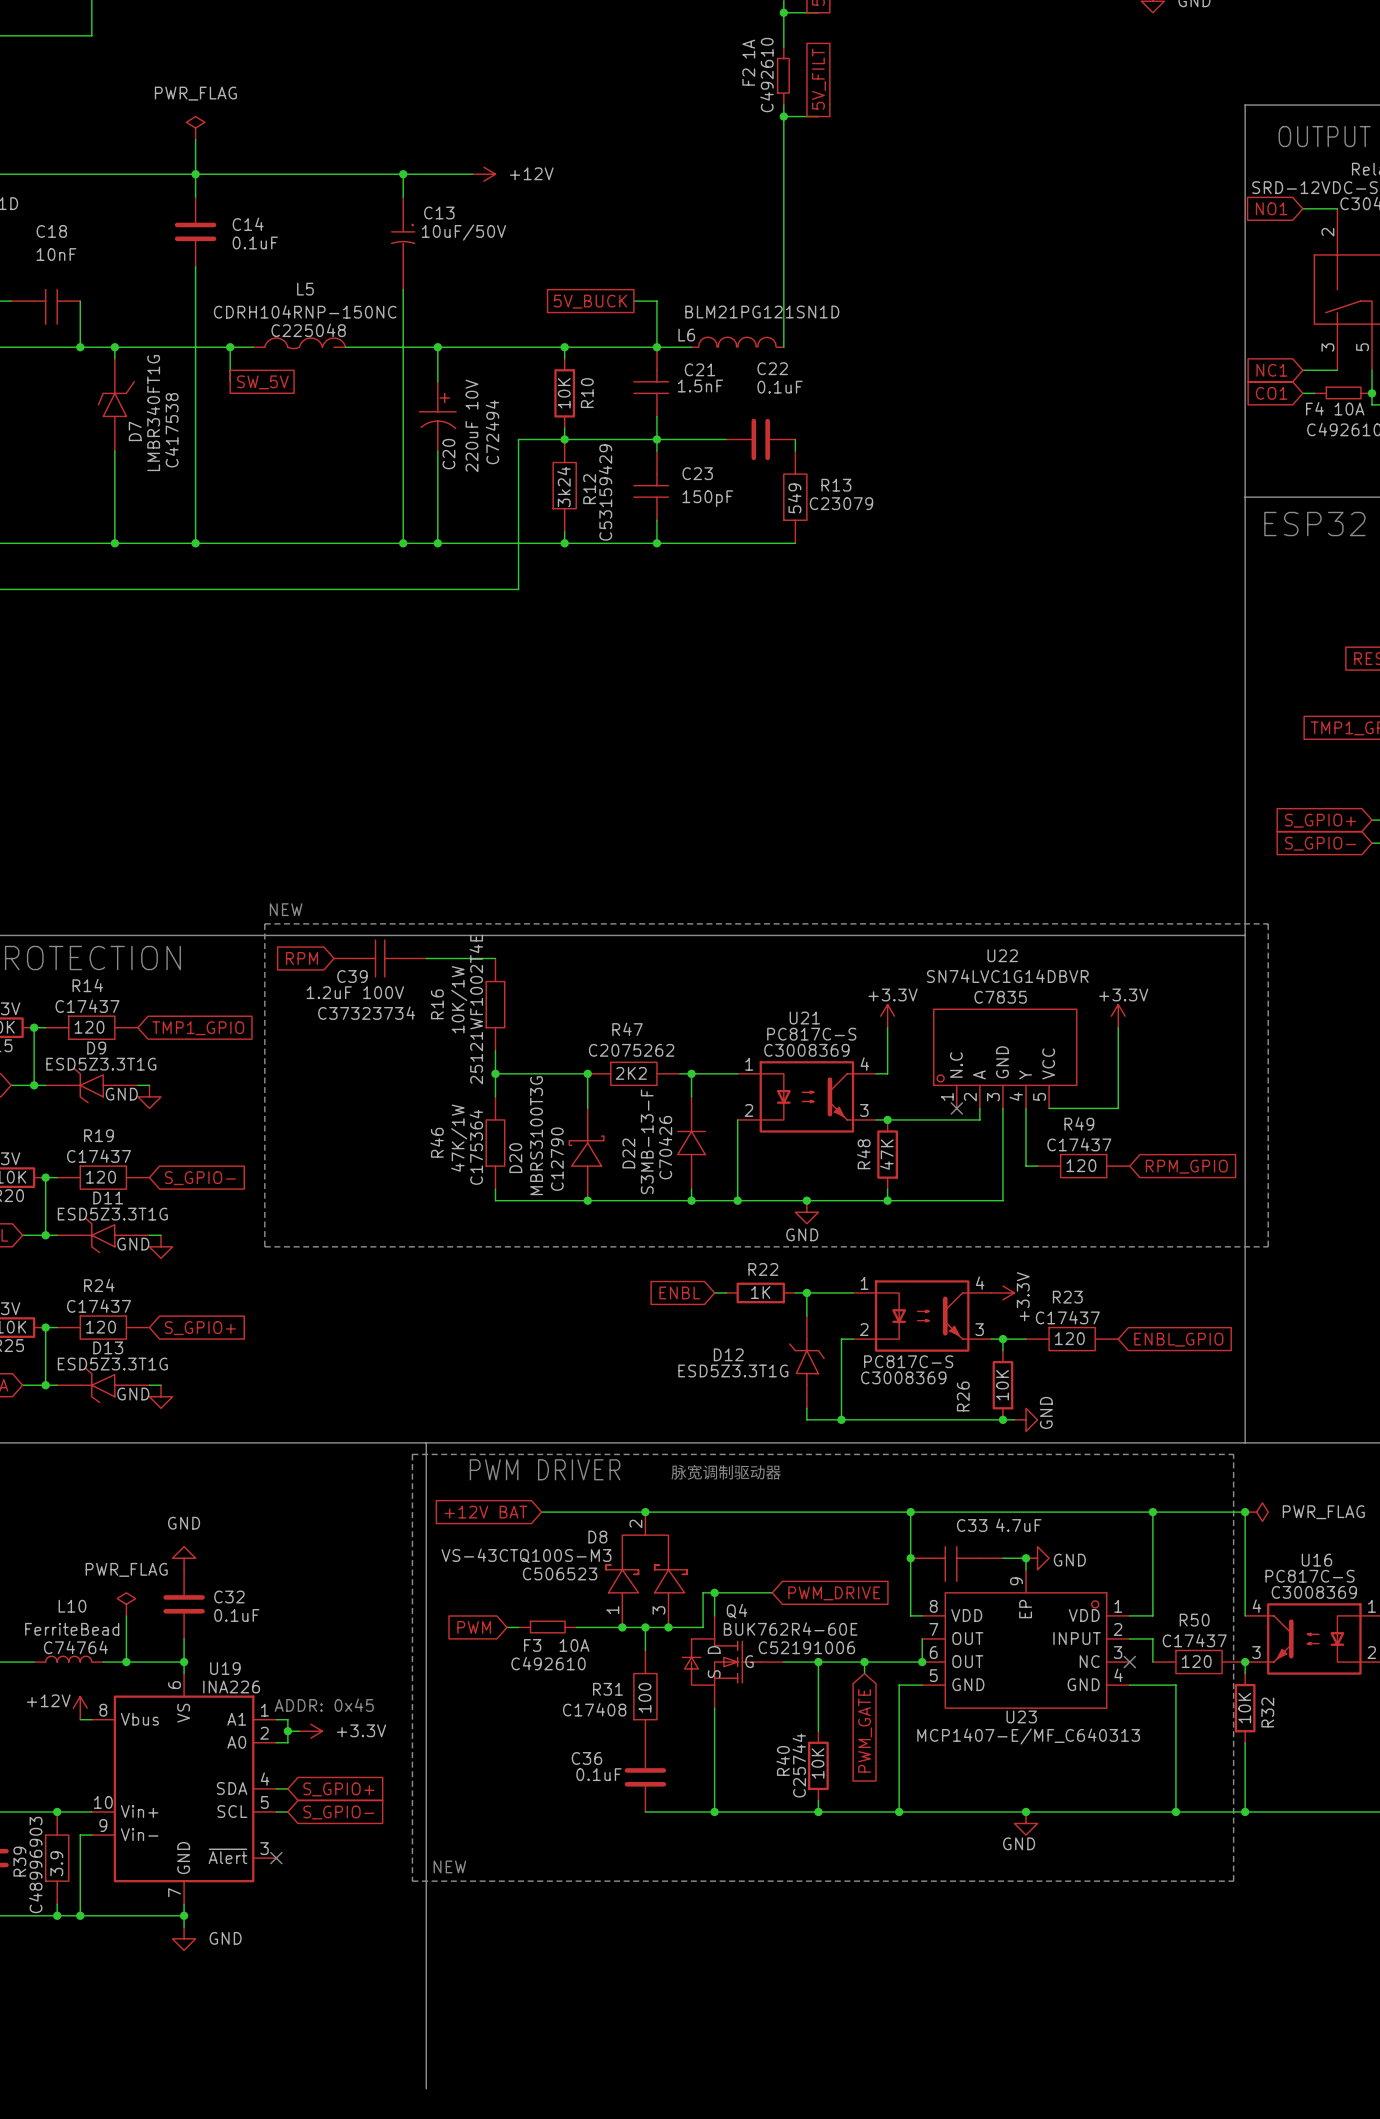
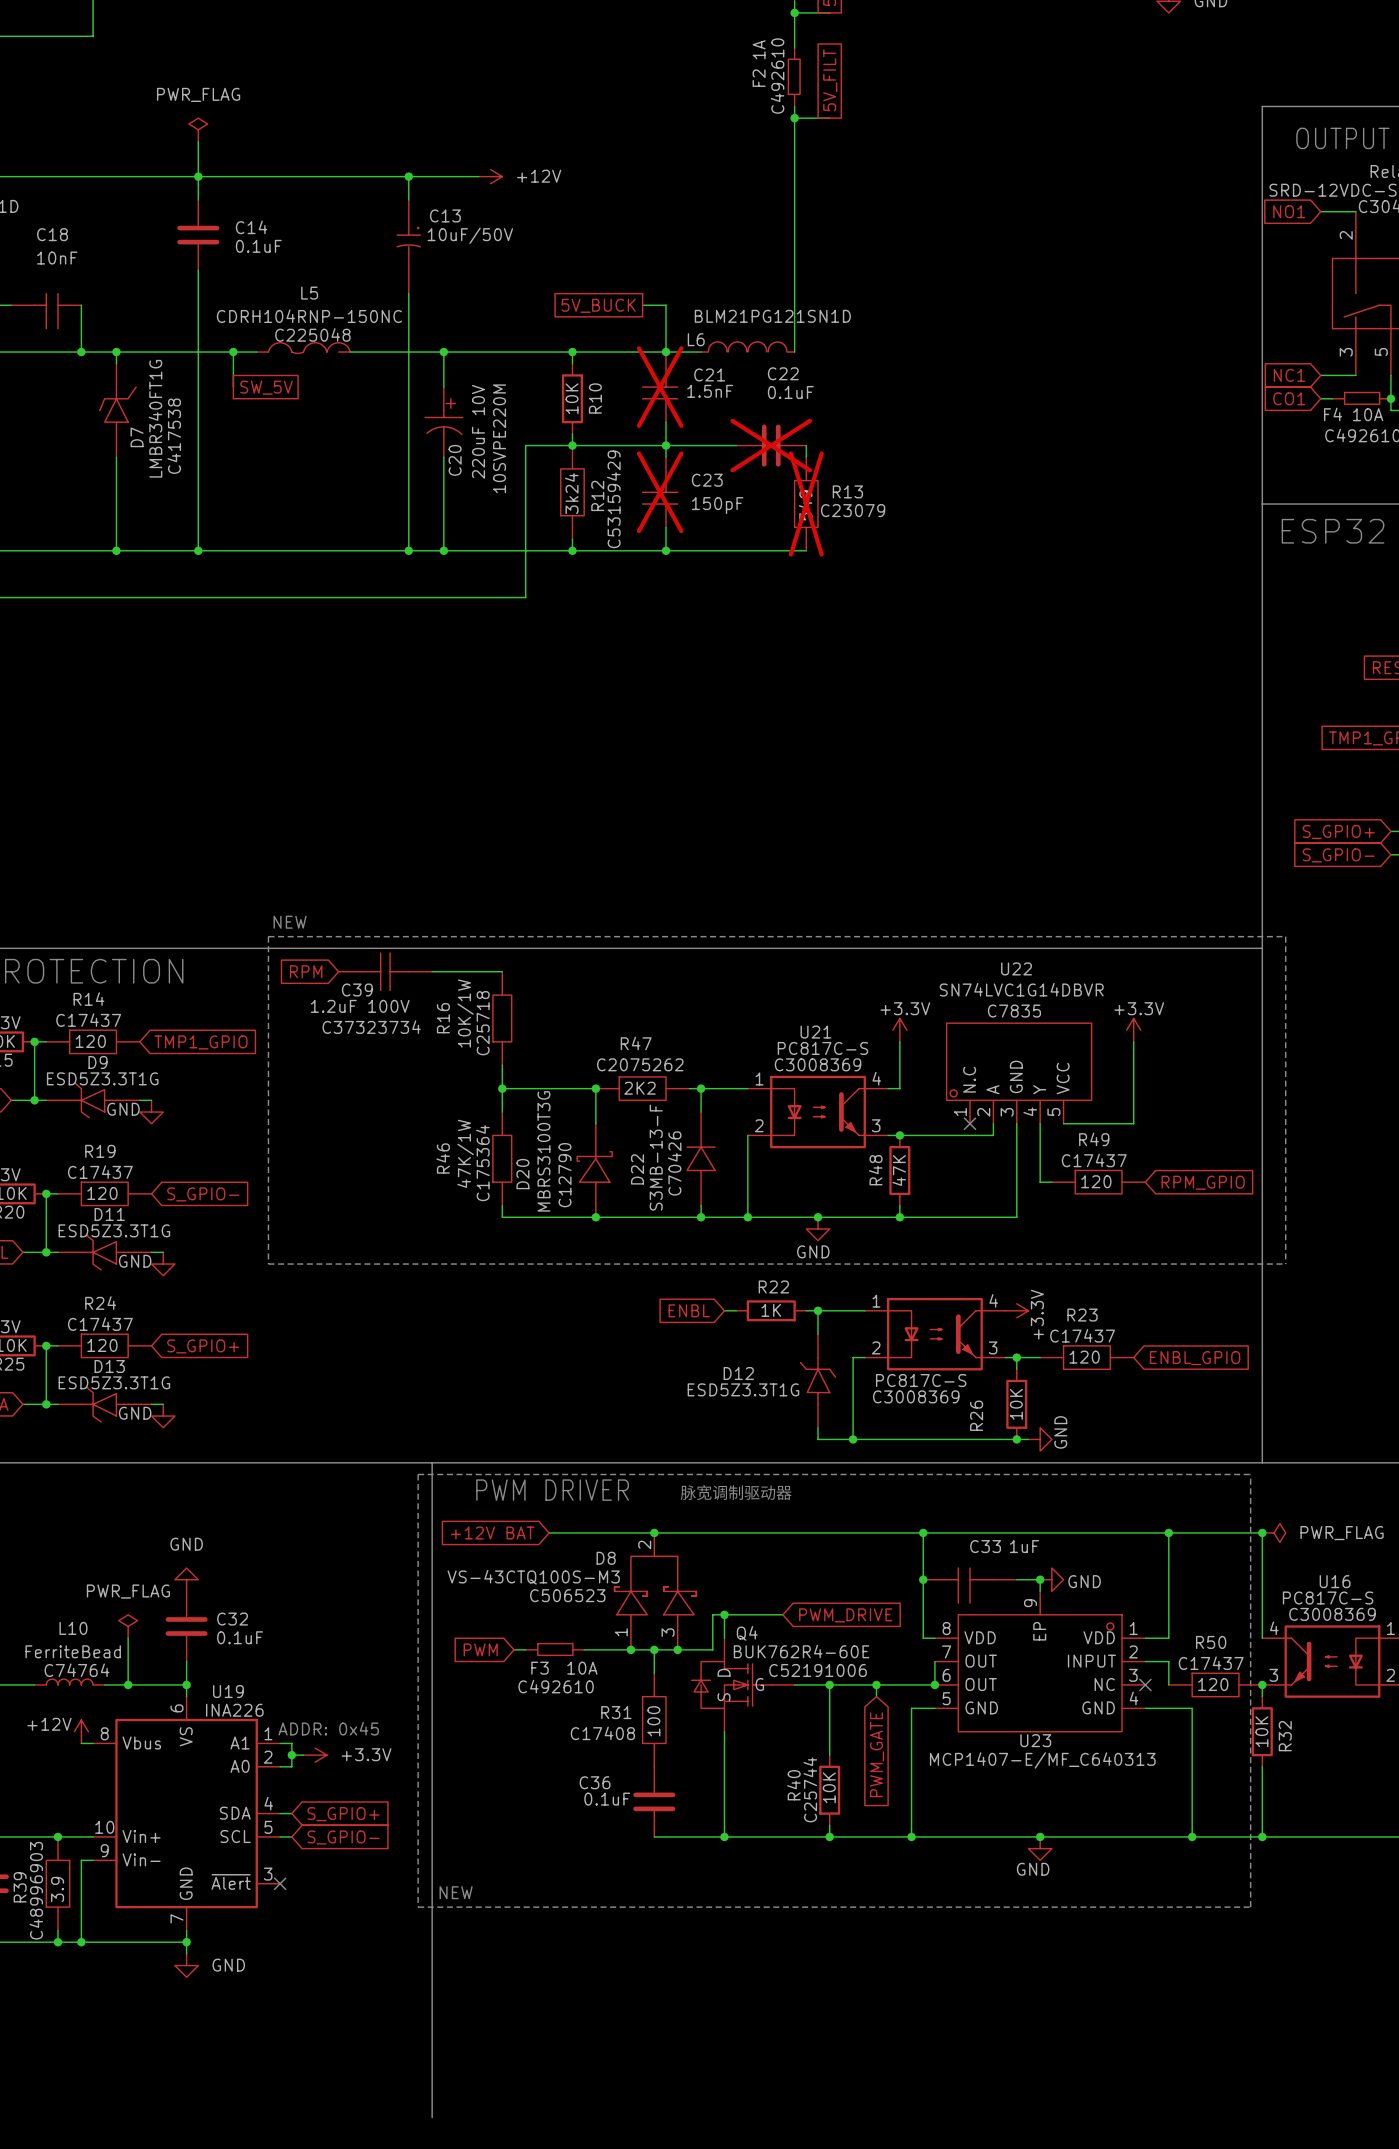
C21 do-not-place cross: none -> (660, 387)
C20 text: C72494 (492, 432) -> 10SVPE220M (499, 438)
C22 do-not-place cross: none -> (771, 445)
C23 do-not-place cross: none -> (660, 492)
R13 do-not-place cross: none -> (806, 504)
R16 text: 25121WF1002T4E (476, 1009) -> C25718 (483, 1023)
C33 value: 4.7uF (1018, 1525) -> 1uF (1024, 1546)

